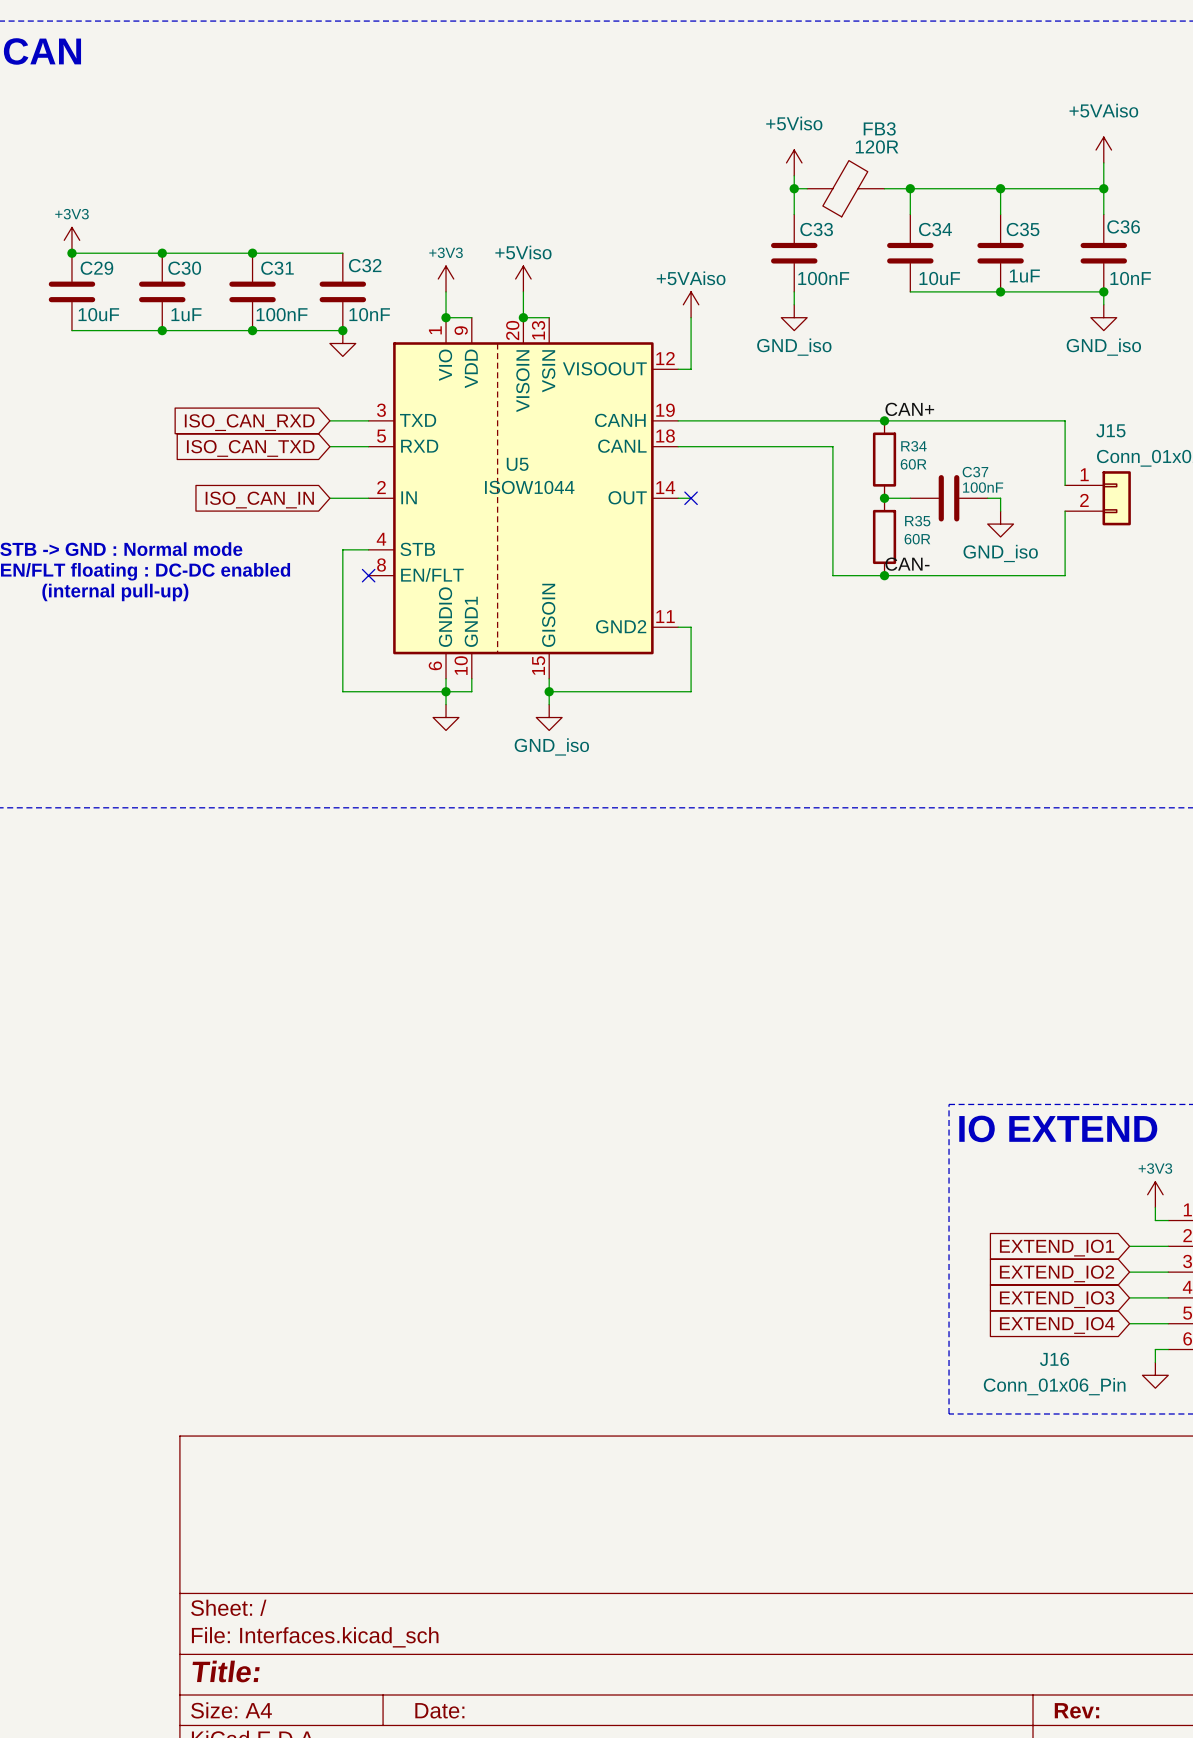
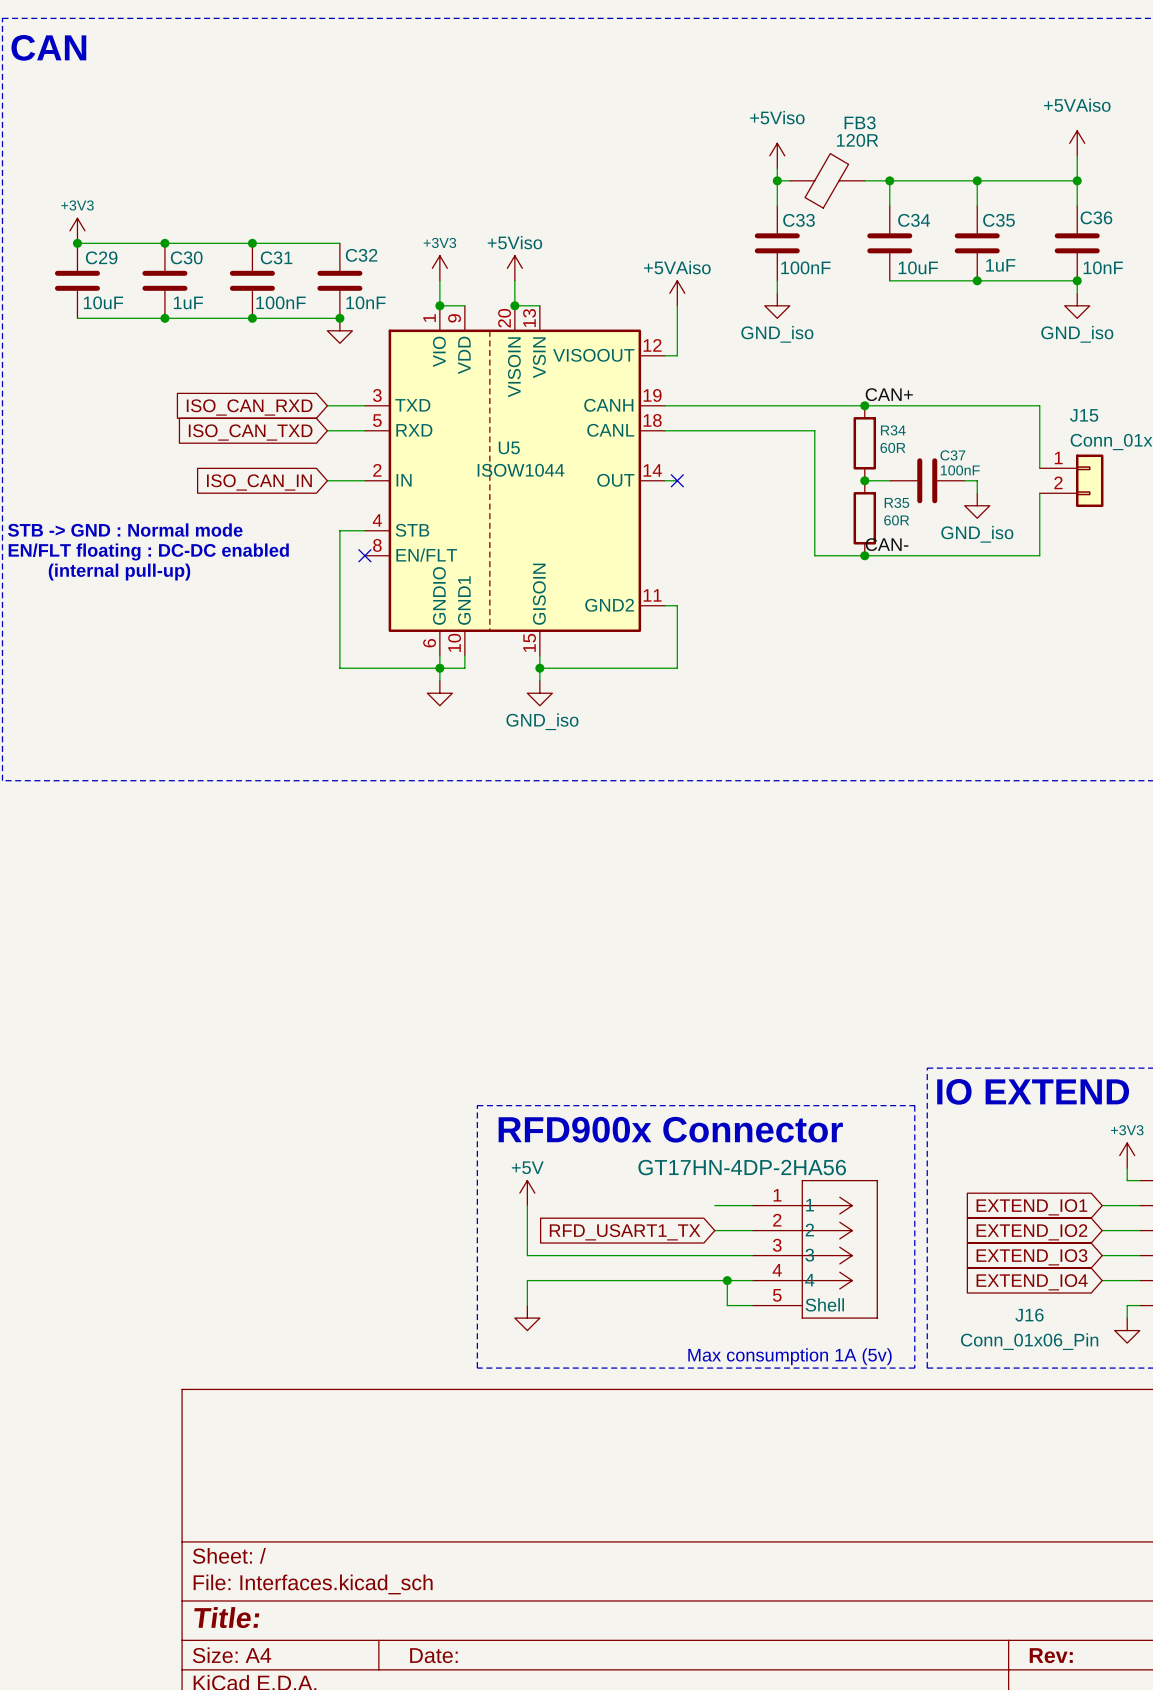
line: none -> (477, 1105) (914, 1105) (914, 1368) (477, 1368) (477, 1105)
text: none -> RFD900x Connector (670, 1129)
power symbol: none -> +5V (527, 1193)
wire: none -> (527, 1205) (527, 1255) (752, 1255)
wire: none -> (714, 1205) (752, 1205)
wire: none -> (714, 1230) (752, 1230)
global label: none -> RFD_USART1_TX (625, 1232)
part: none -> GT17HN-4DP-2HA56 (815, 1249)
wire: none -> (727, 1280) (727, 1305) (752, 1305)
junction: none -> (727, 1280)
wire: none -> (752, 1280) (527, 1280) (527, 1305)
power symbol: none -> (527, 1318)
text: none -> Max consumption 1A (5v) (789, 1356)

